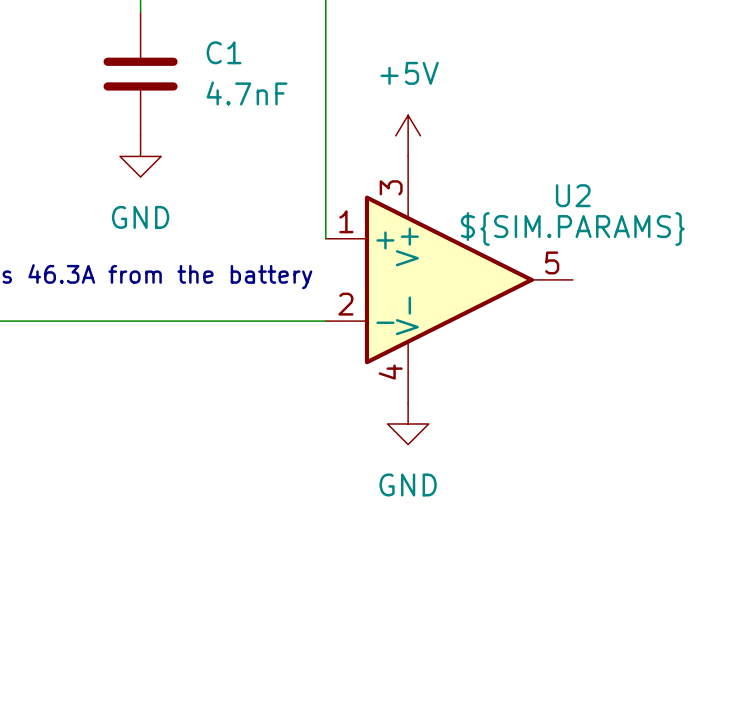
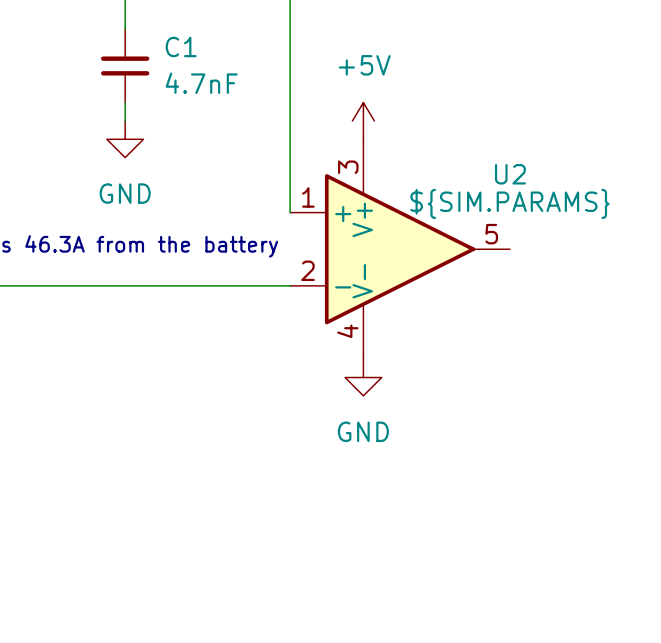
C1 symbol: [103, 12, 178, 136] -> [100, 29, 150, 103]

